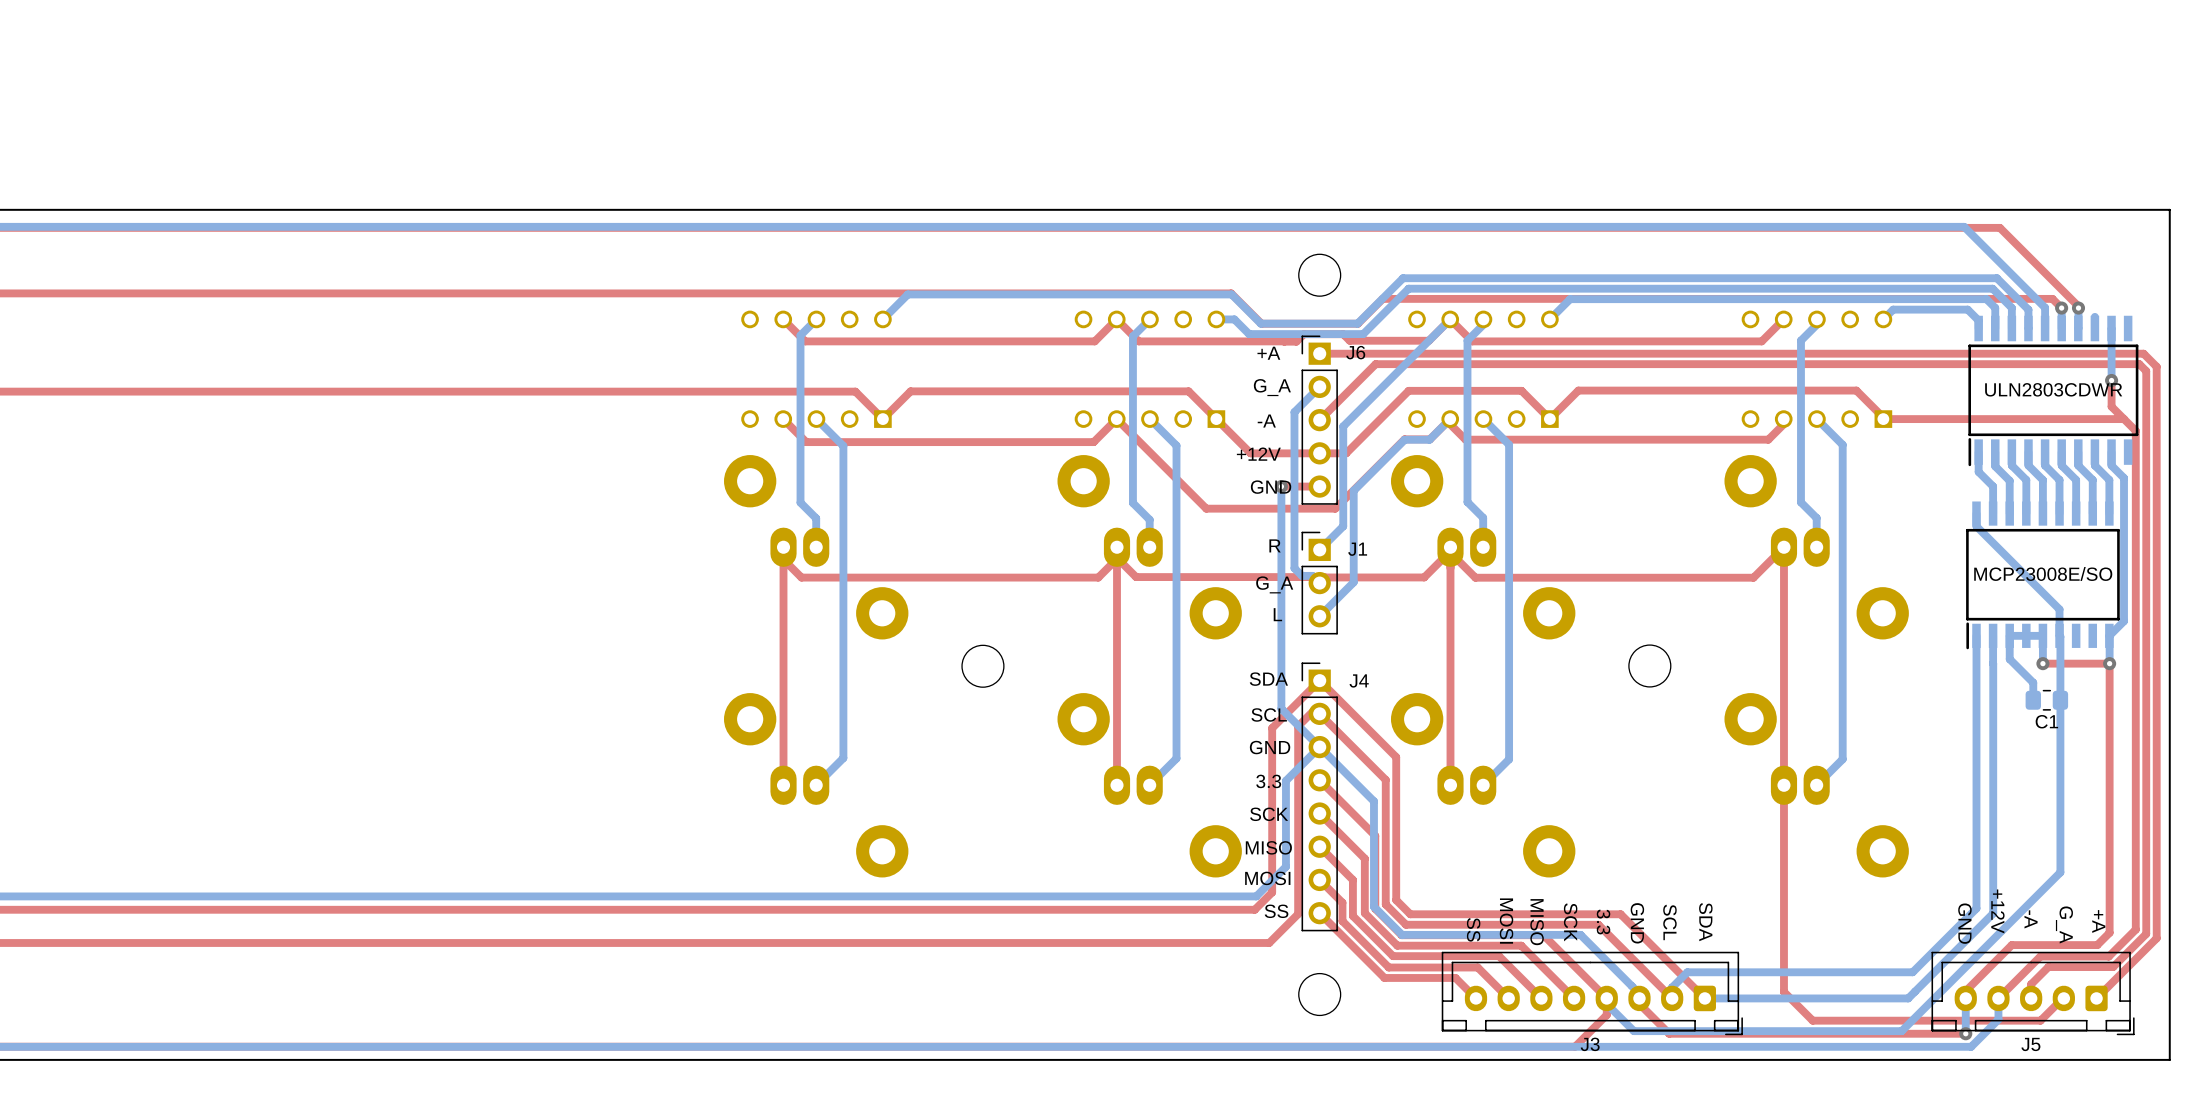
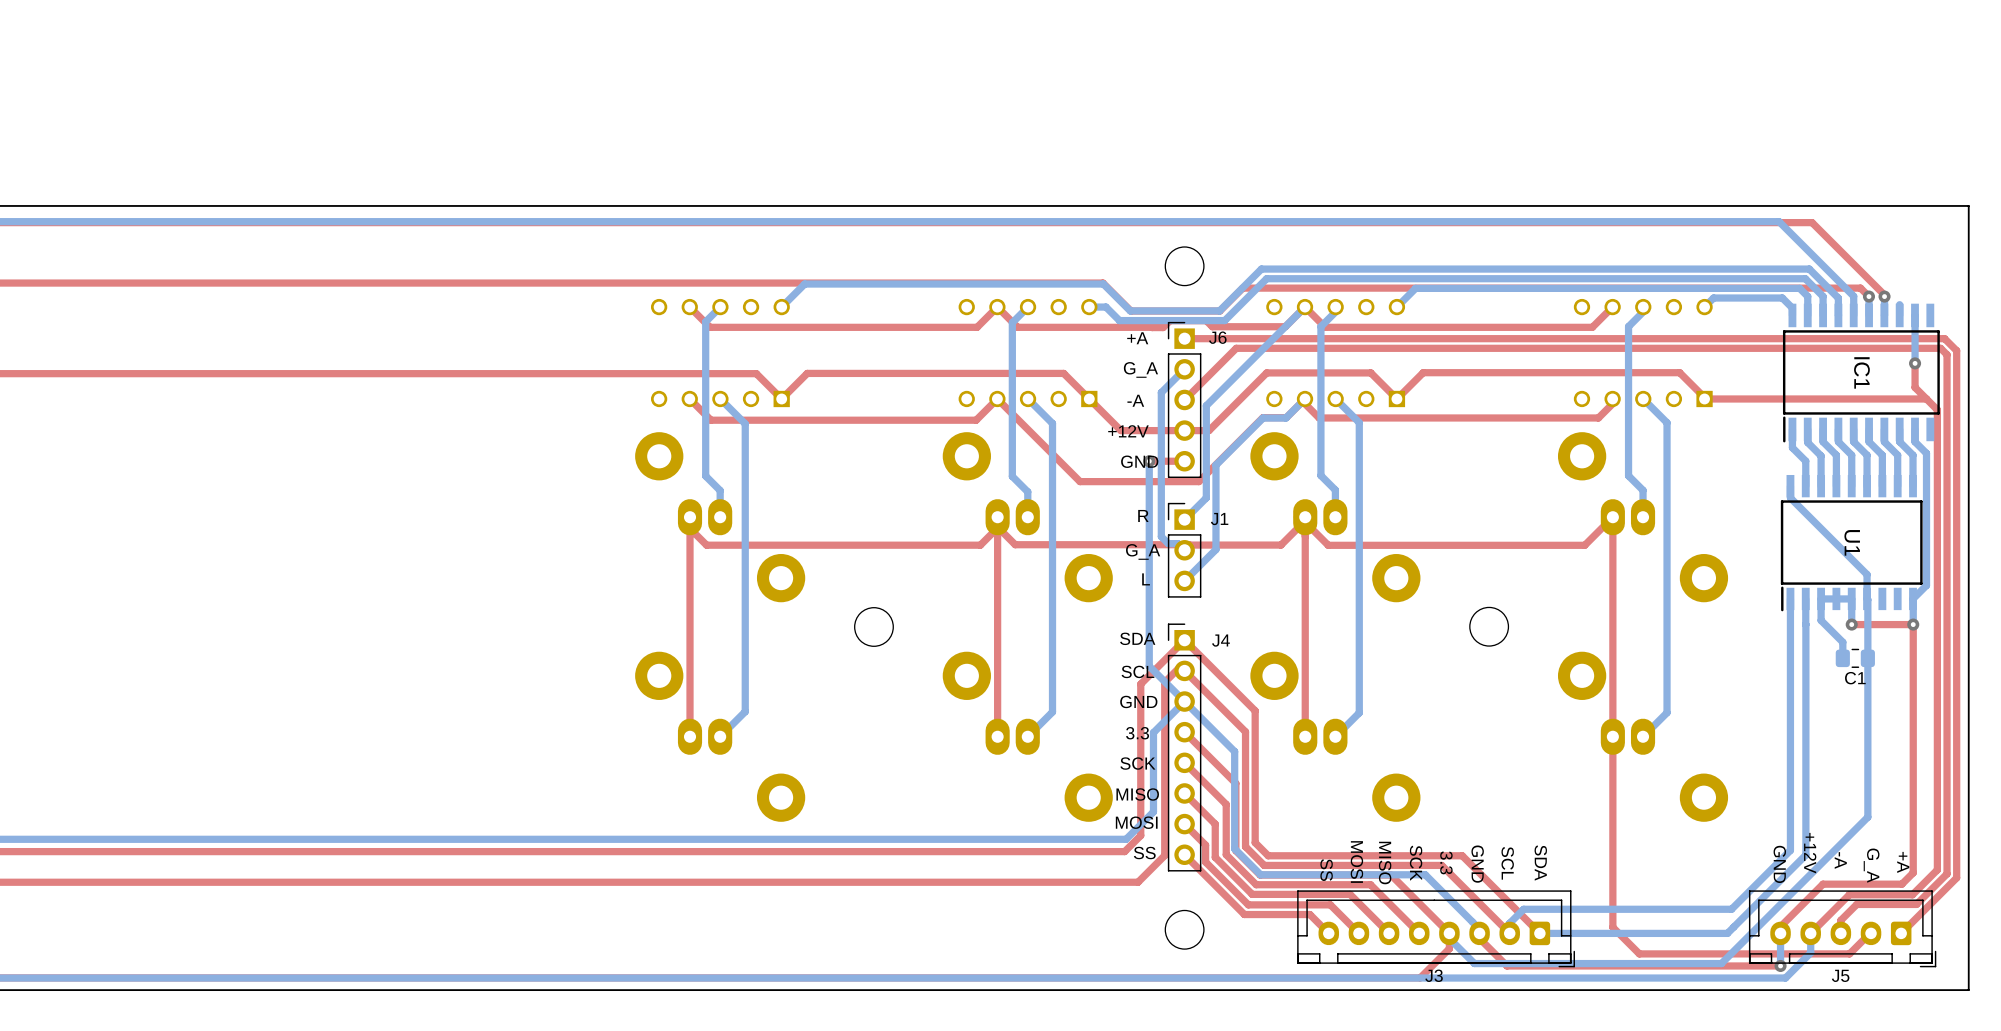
IC1 value: ULN2803CDWR (2053, 389) -> none
IC1 name: none -> IC1 (1861, 372)
U1 value: MCP23008E/SO (2043, 573) -> none
U1 name: none -> U1 (1852, 542)

